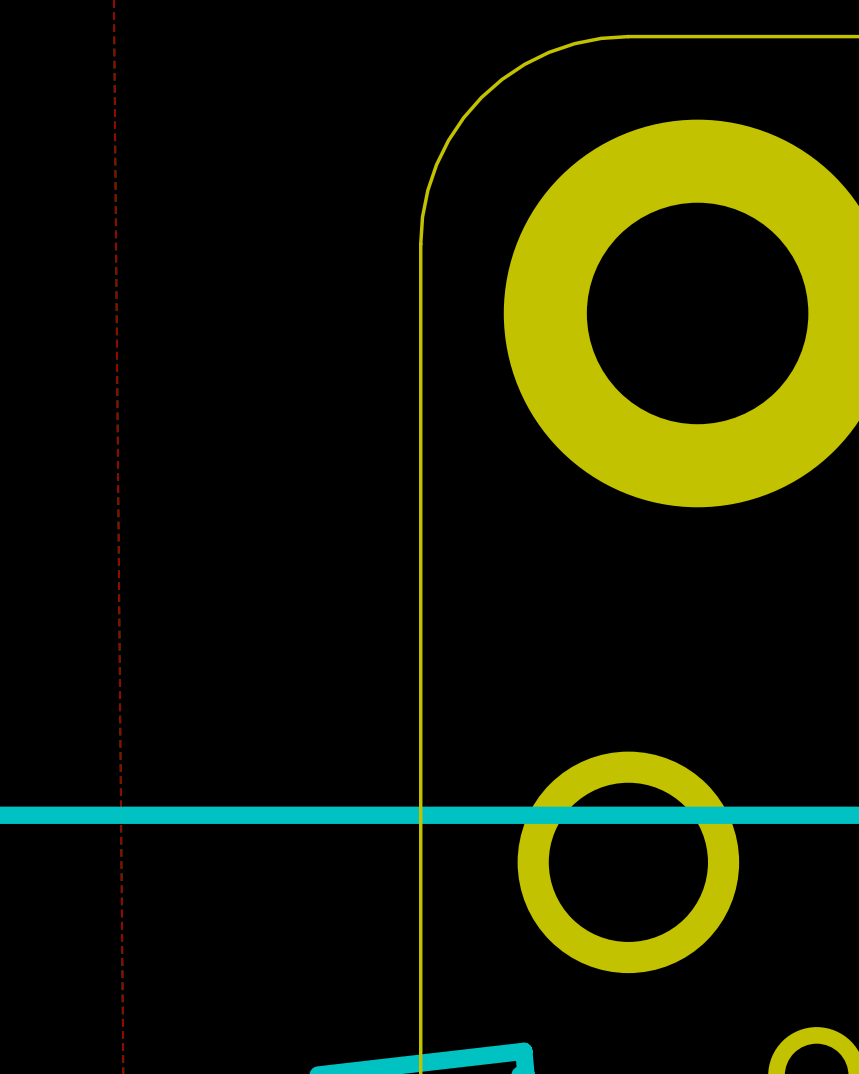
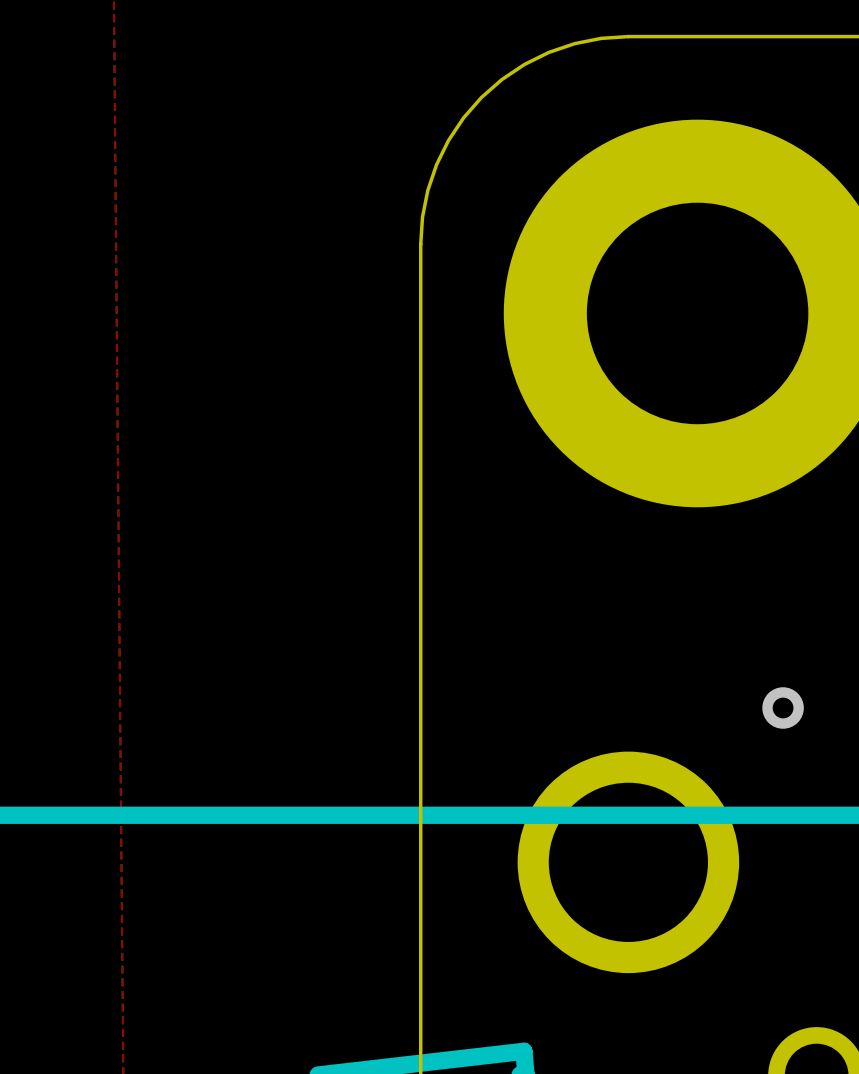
via: none -> (783, 708)

